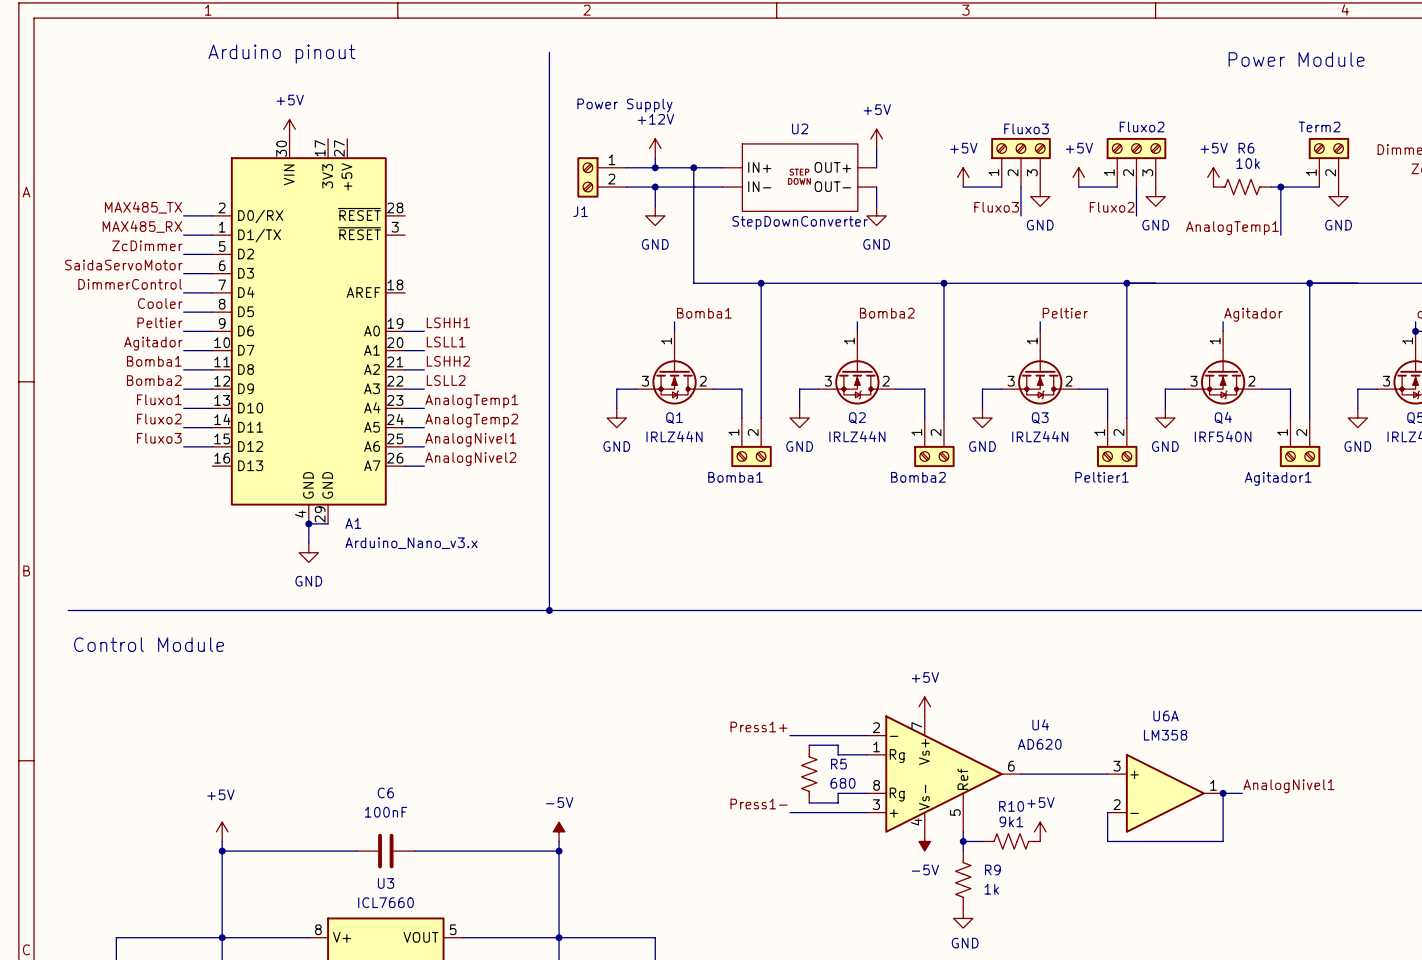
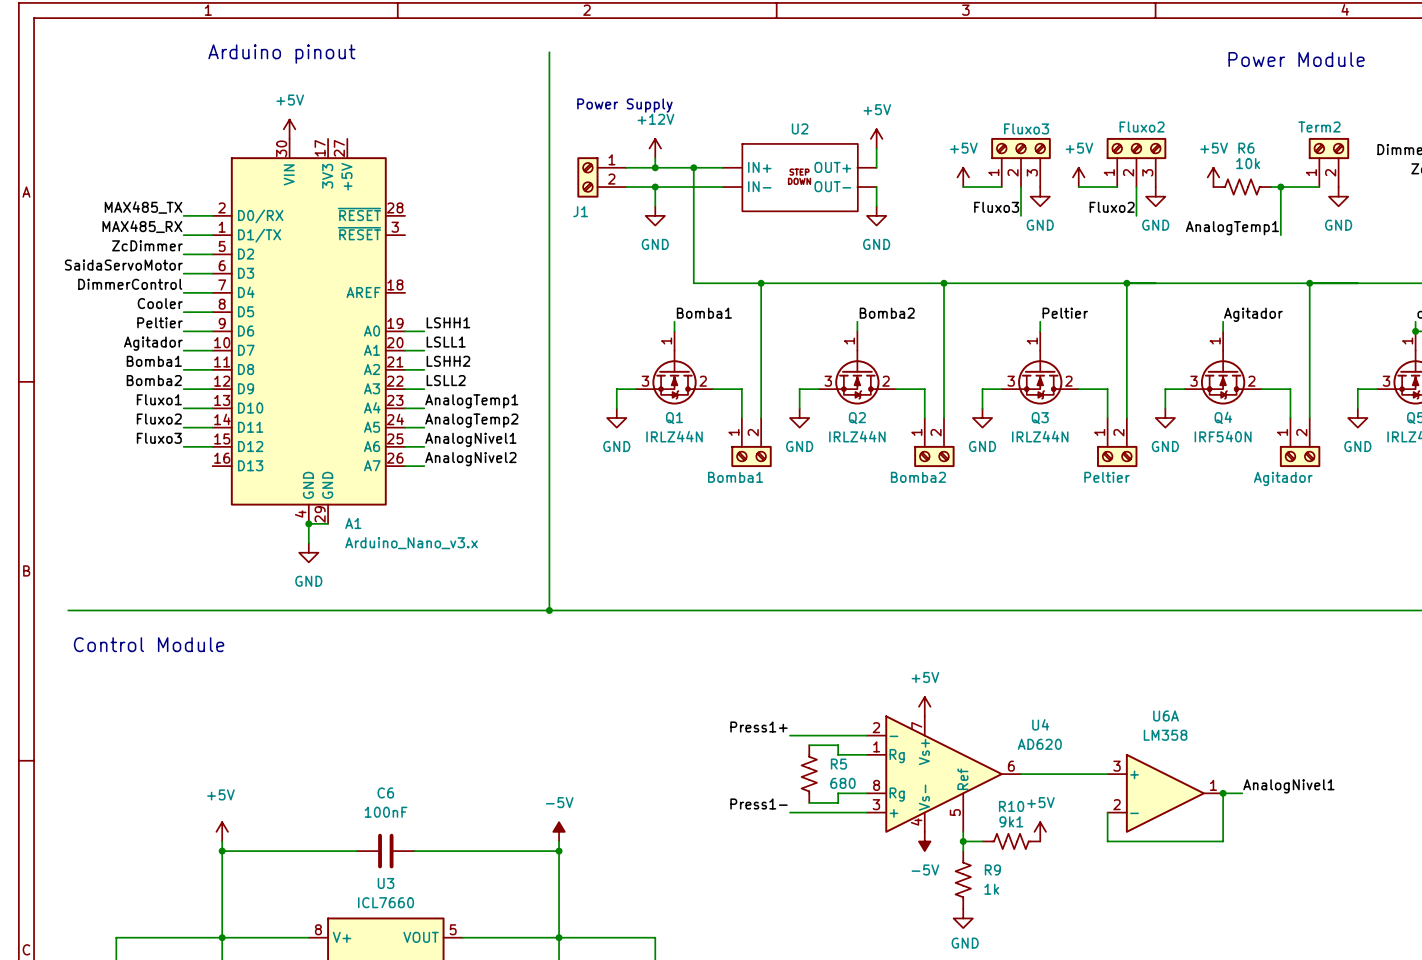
U2 value: StepDownConverter (800, 222) -> none
Peltier1 name: Peltier1 (1101, 477) -> Peltier (1107, 477)
Agitador1 name: Agitador1 (1278, 478) -> Agitador (1283, 478)

